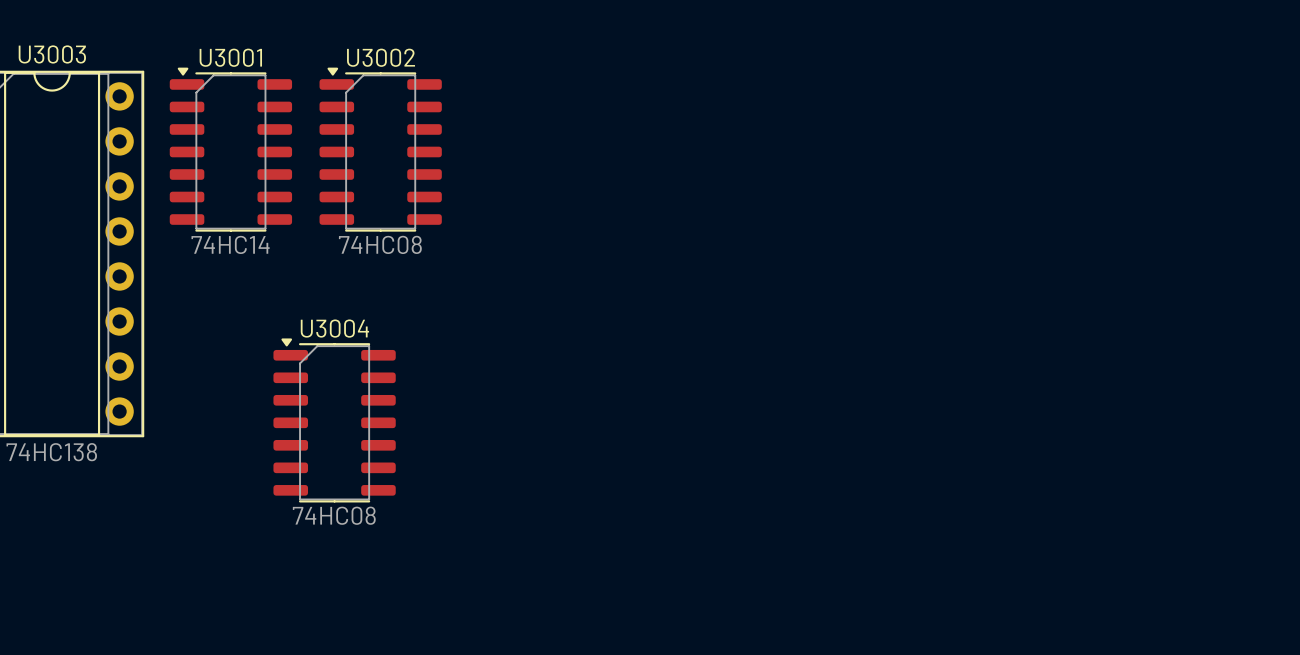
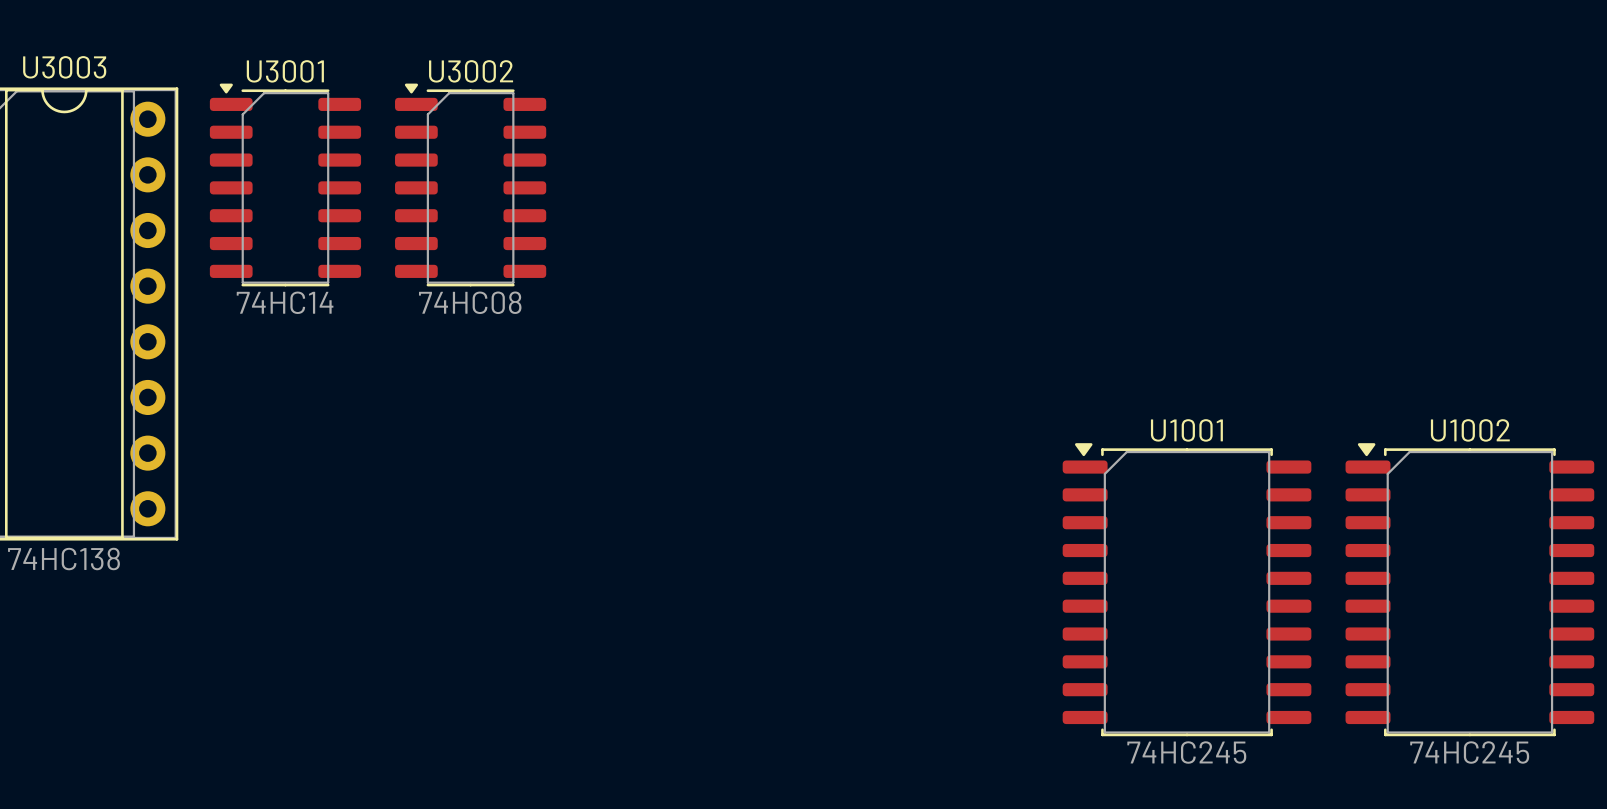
U3004: 74HC08 (334, 420) -> none
U1001: none -> 74HC245 (1187, 589)
U1002: none -> 74HC245 (1469, 589)

